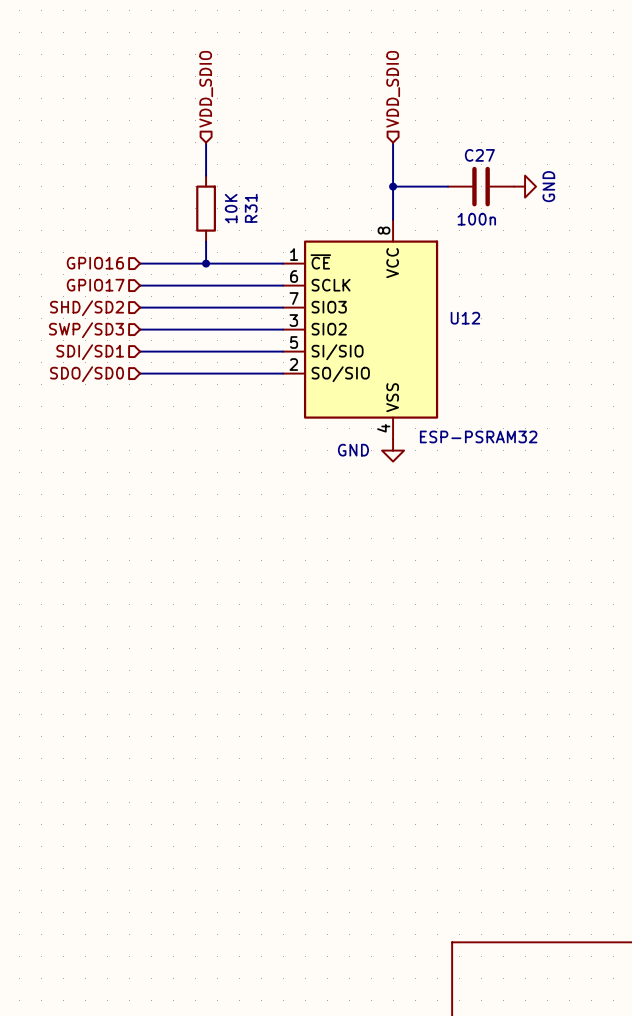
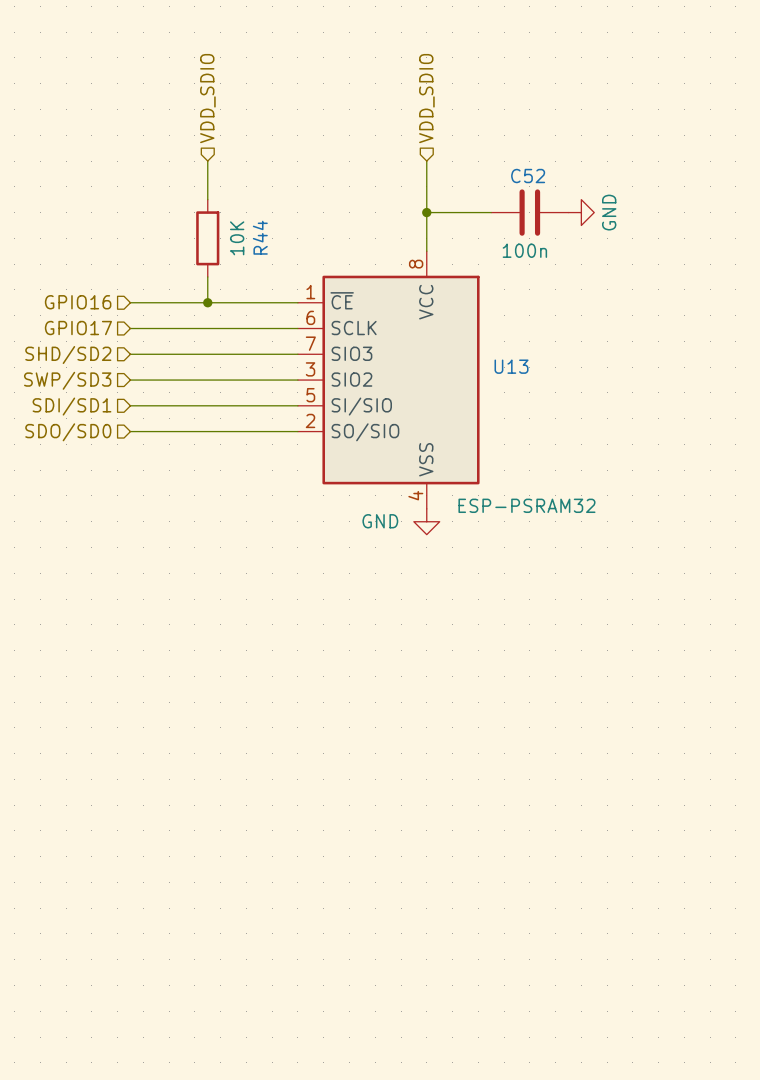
C27 name: C27 (479, 155) -> C52 (528, 176)
R31 name: R31 (251, 208) -> R44 (260, 237)
U12 name: U12 (465, 318) -> U13 (511, 366)

